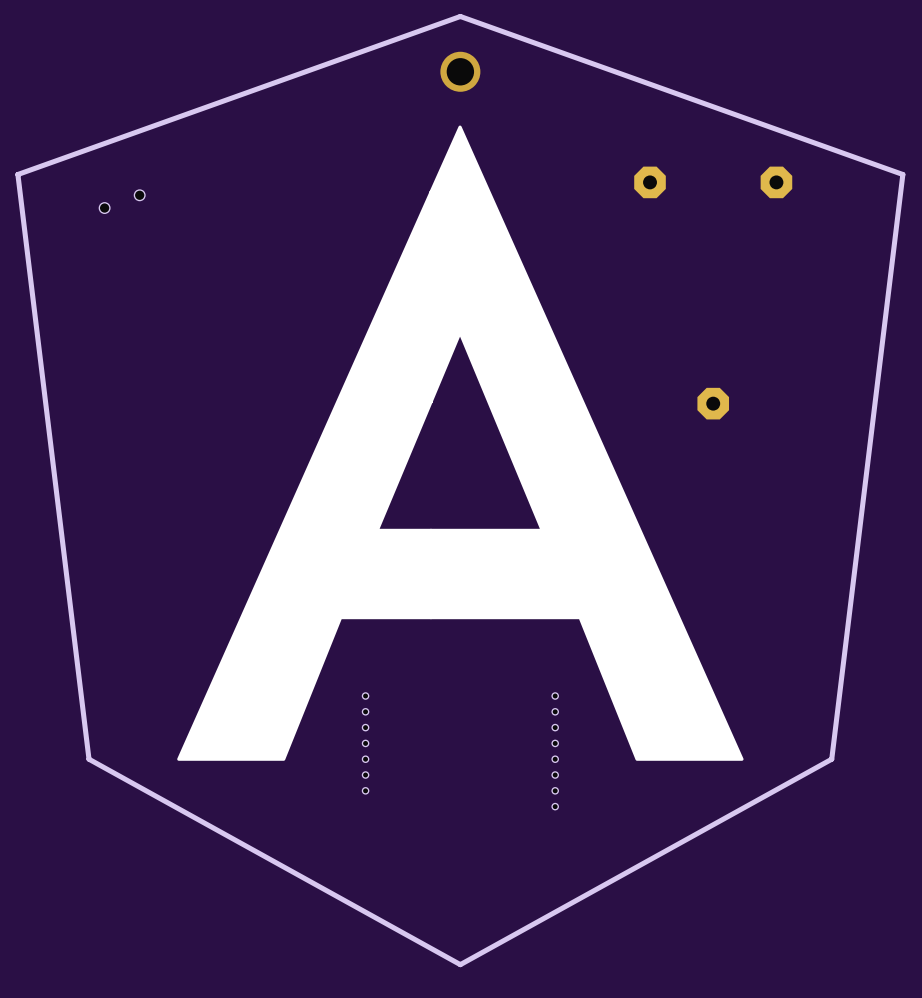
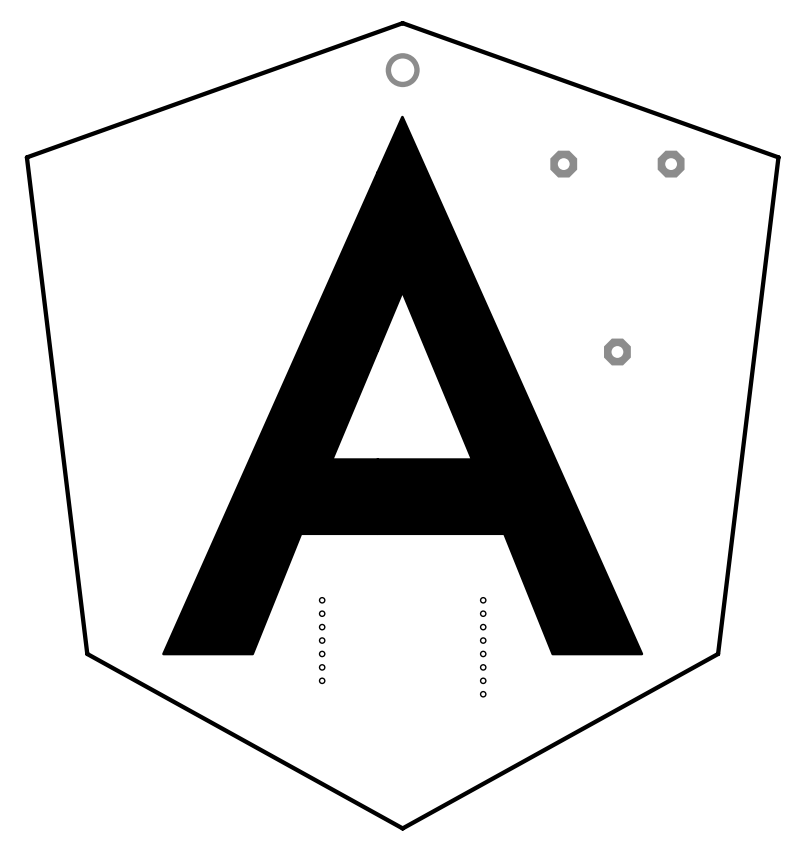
part: (122, 201) -> none

